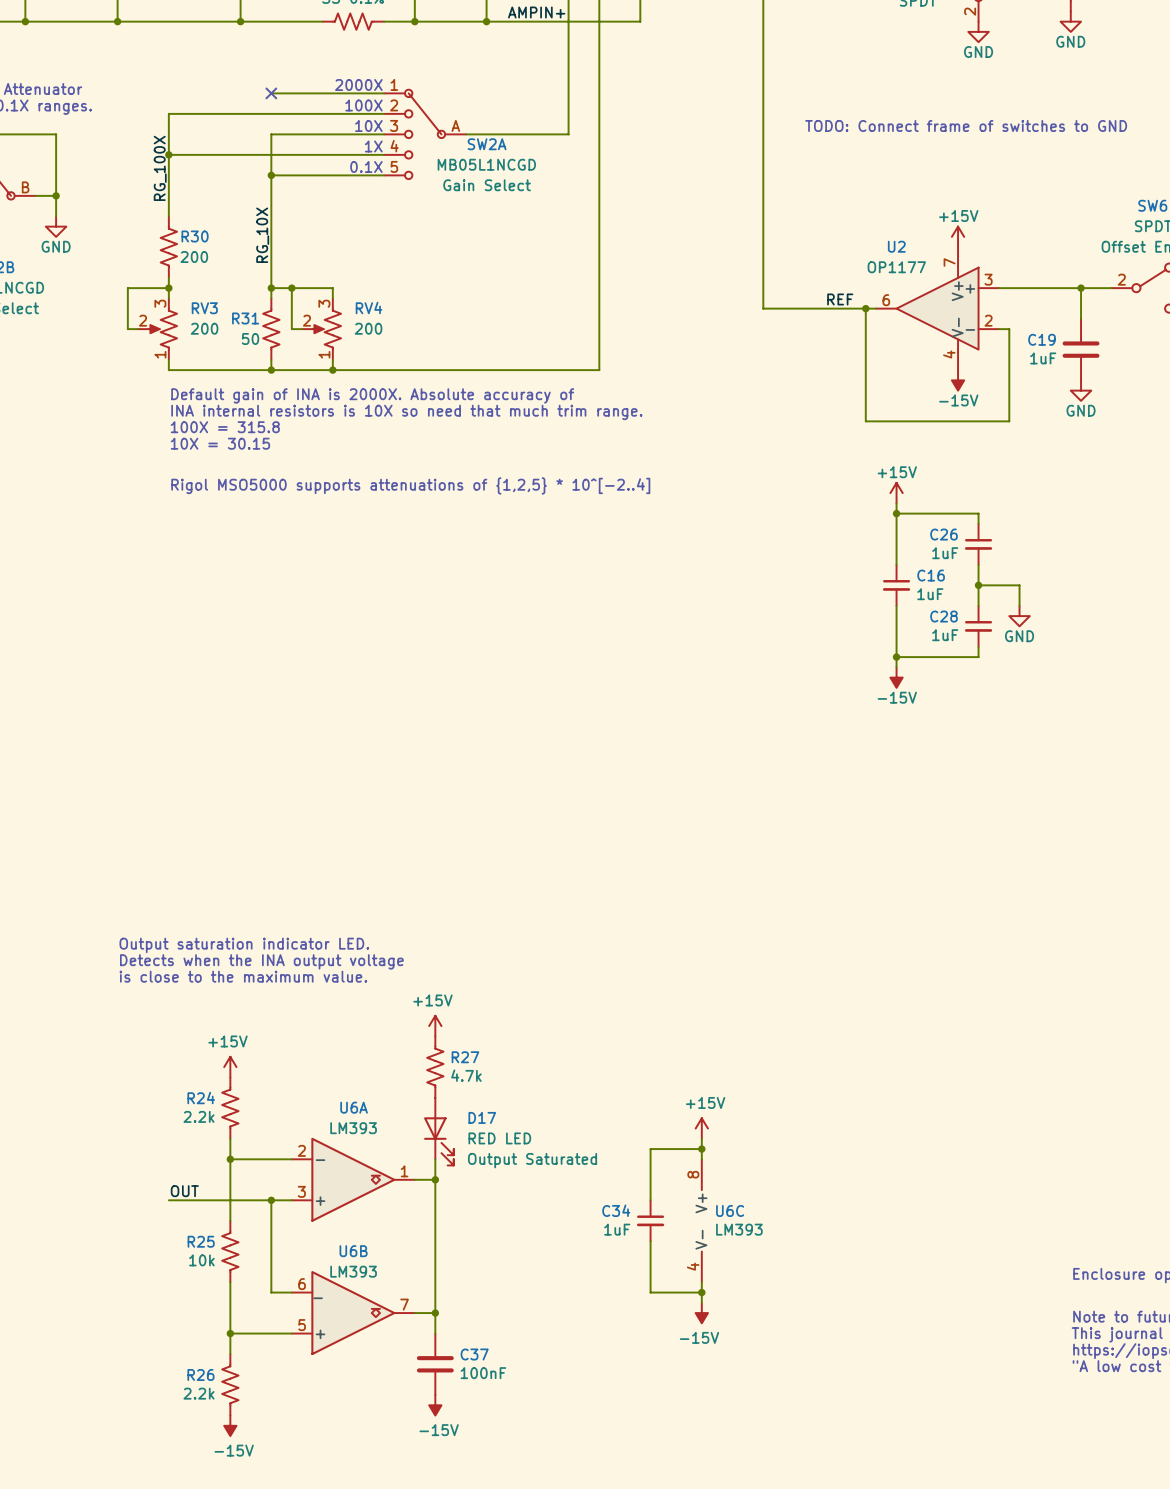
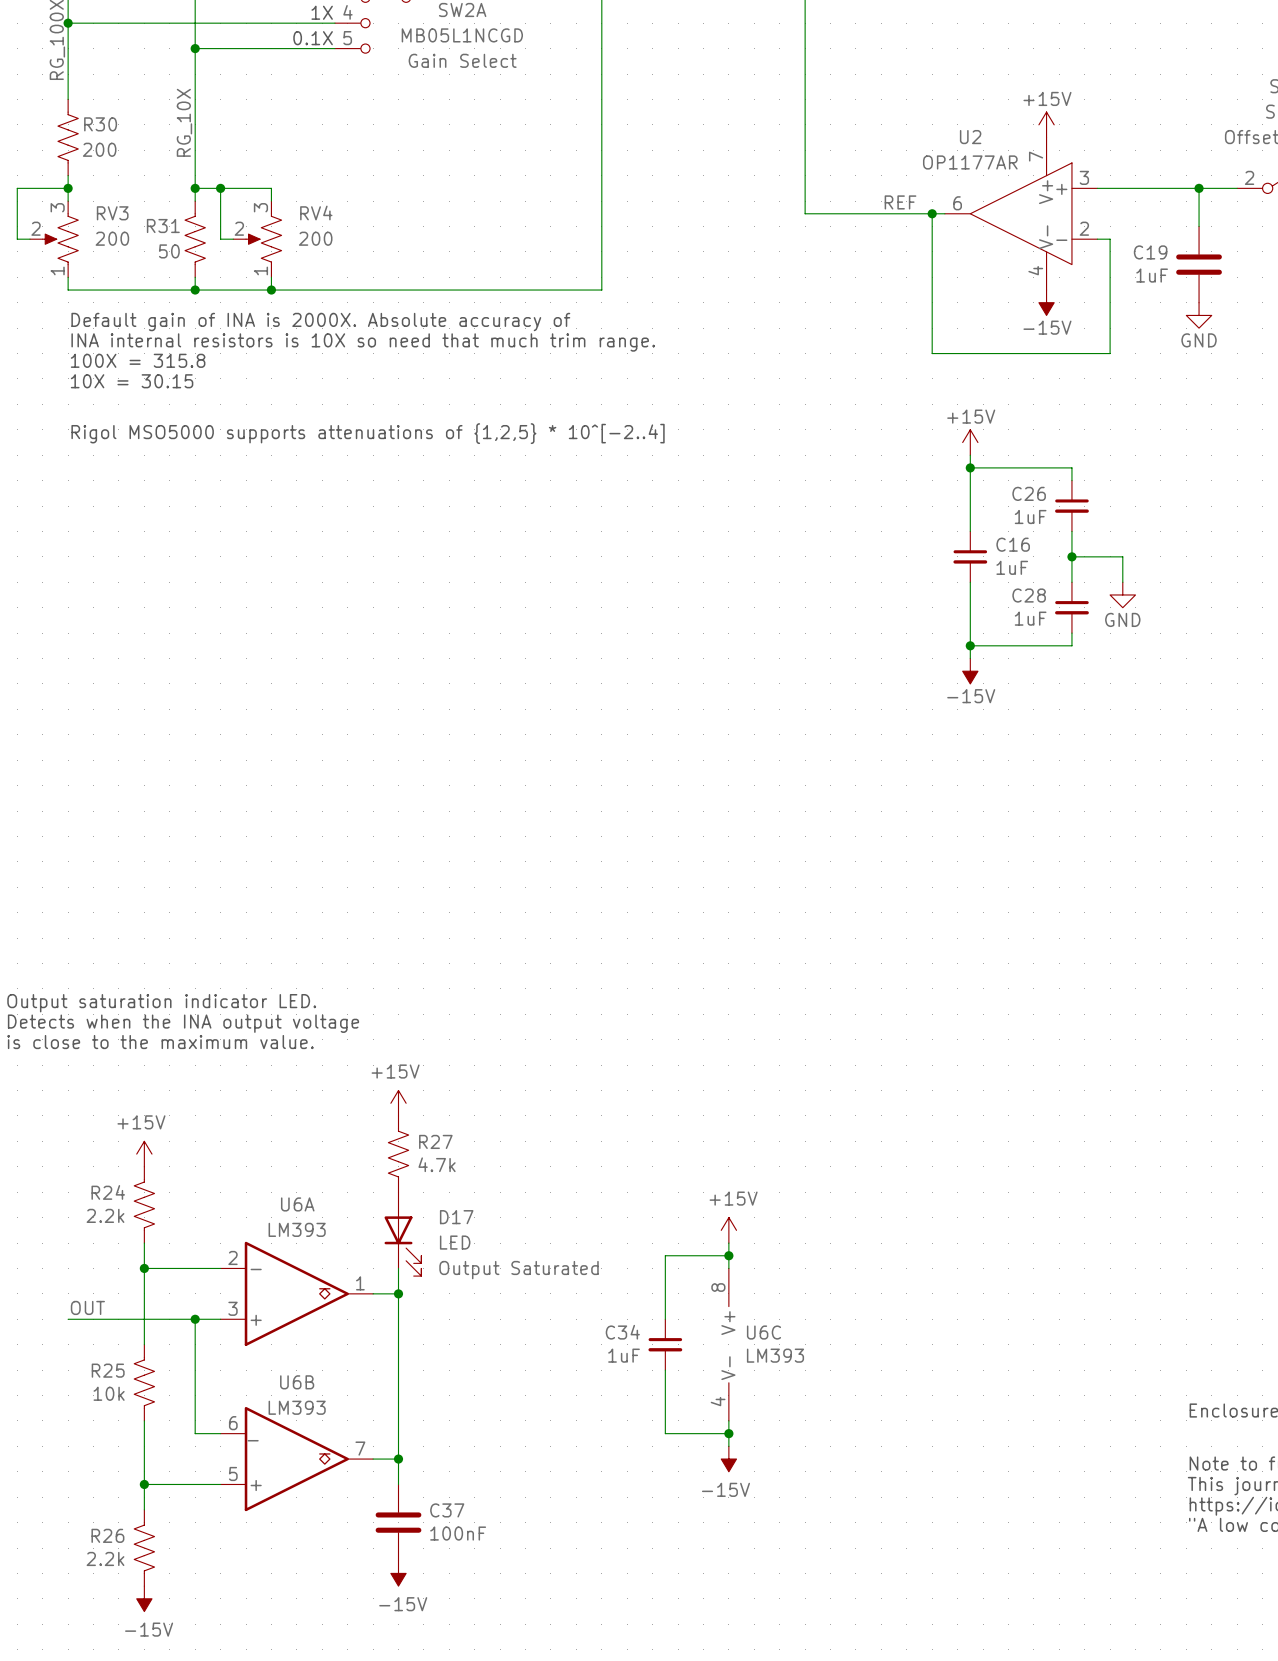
U2 value: OP1177 (896, 267) -> OP1177AR (970, 162)
D17 value: RED LED (499, 1138) -> LED (455, 1242)

